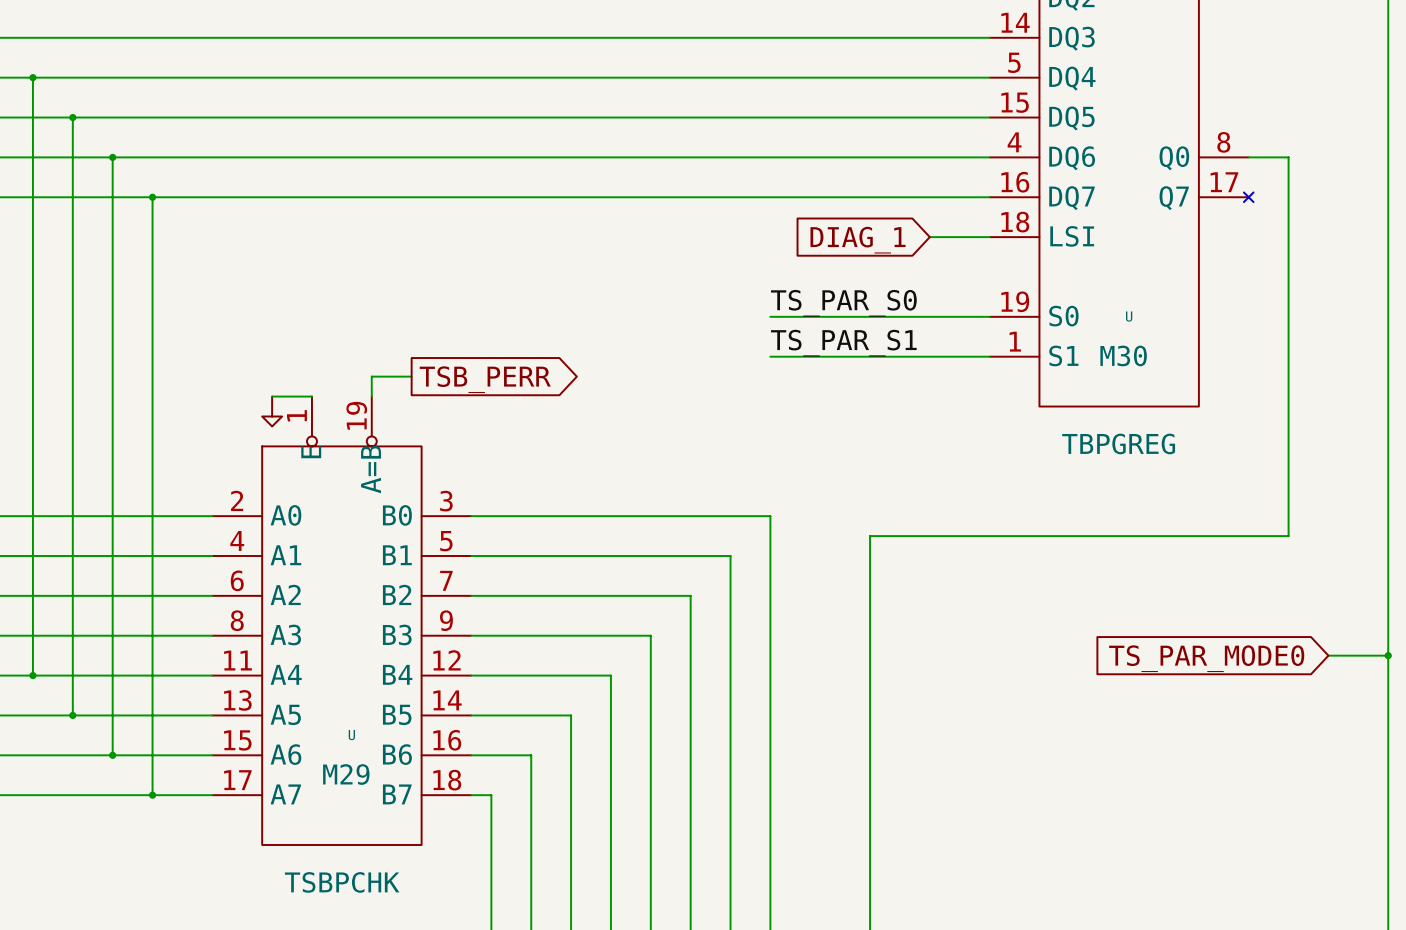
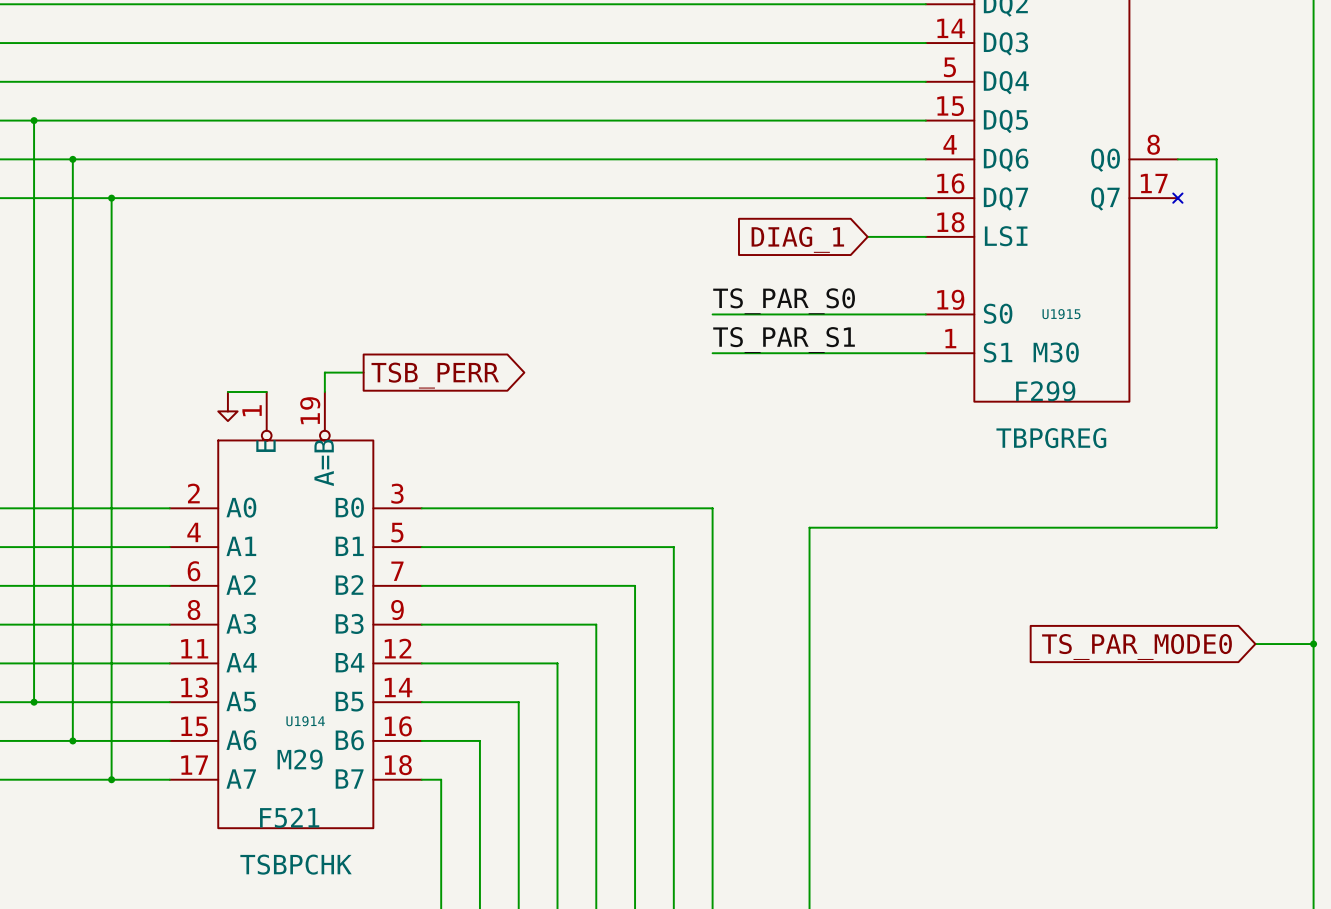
U name: U (1129, 316) -> U1915 (1061, 314)
U value: none -> F299 (1045, 391)
U name: U (351, 735) -> U1914 (305, 721)
U value: none -> F521 (289, 817)

